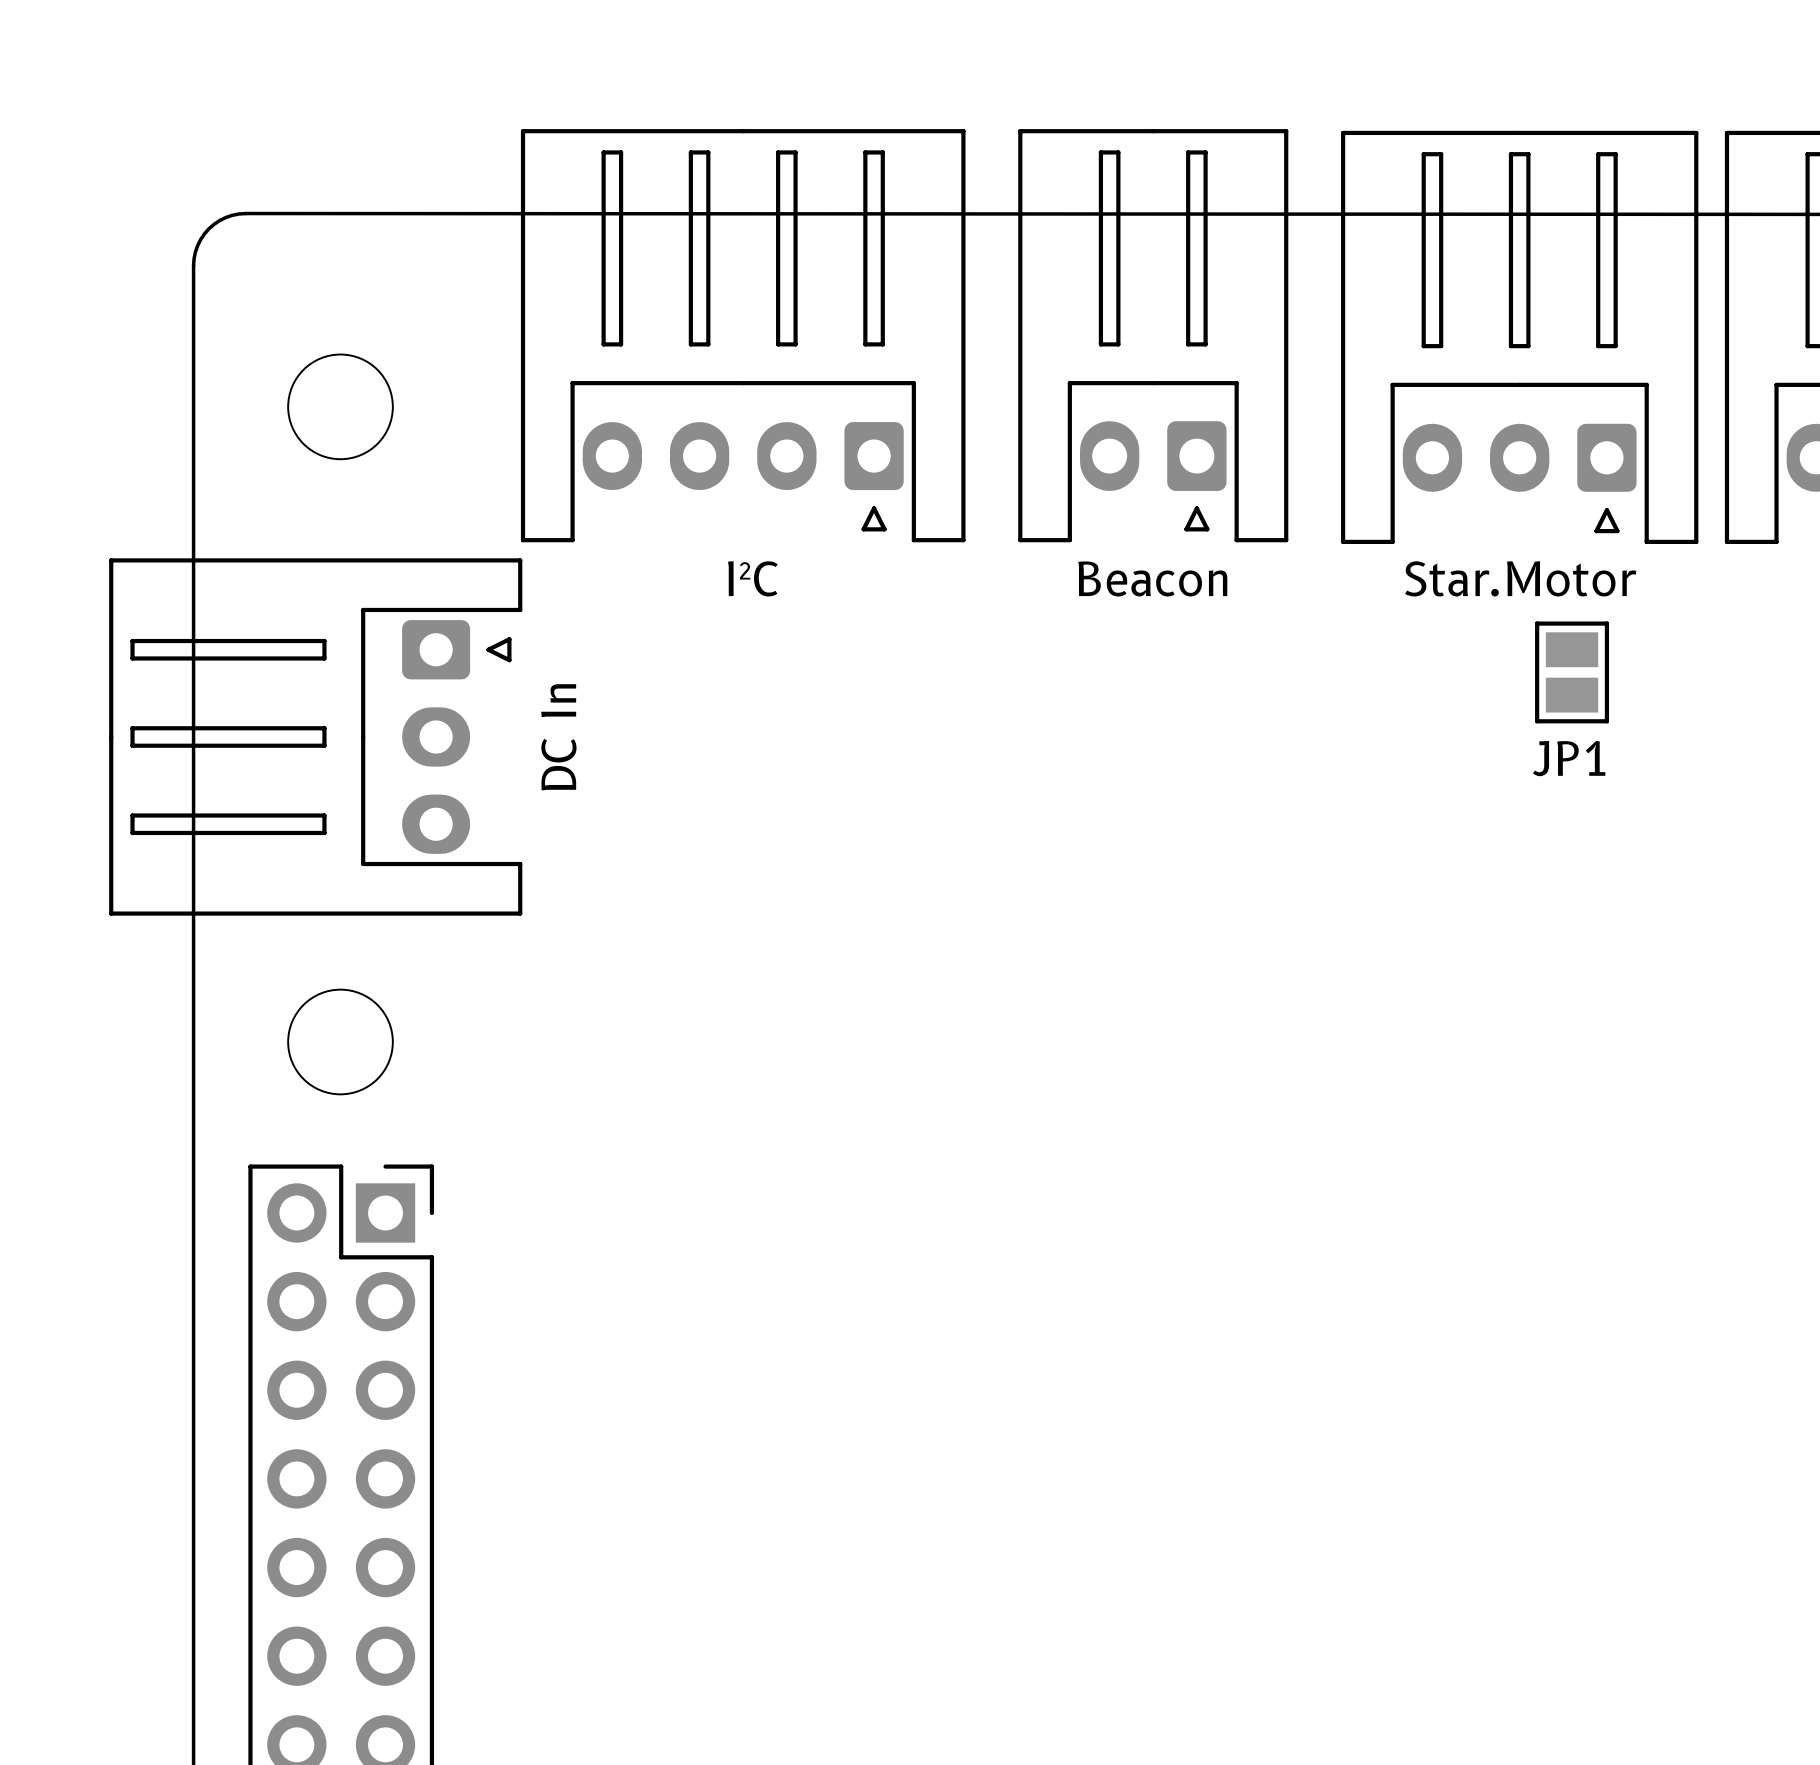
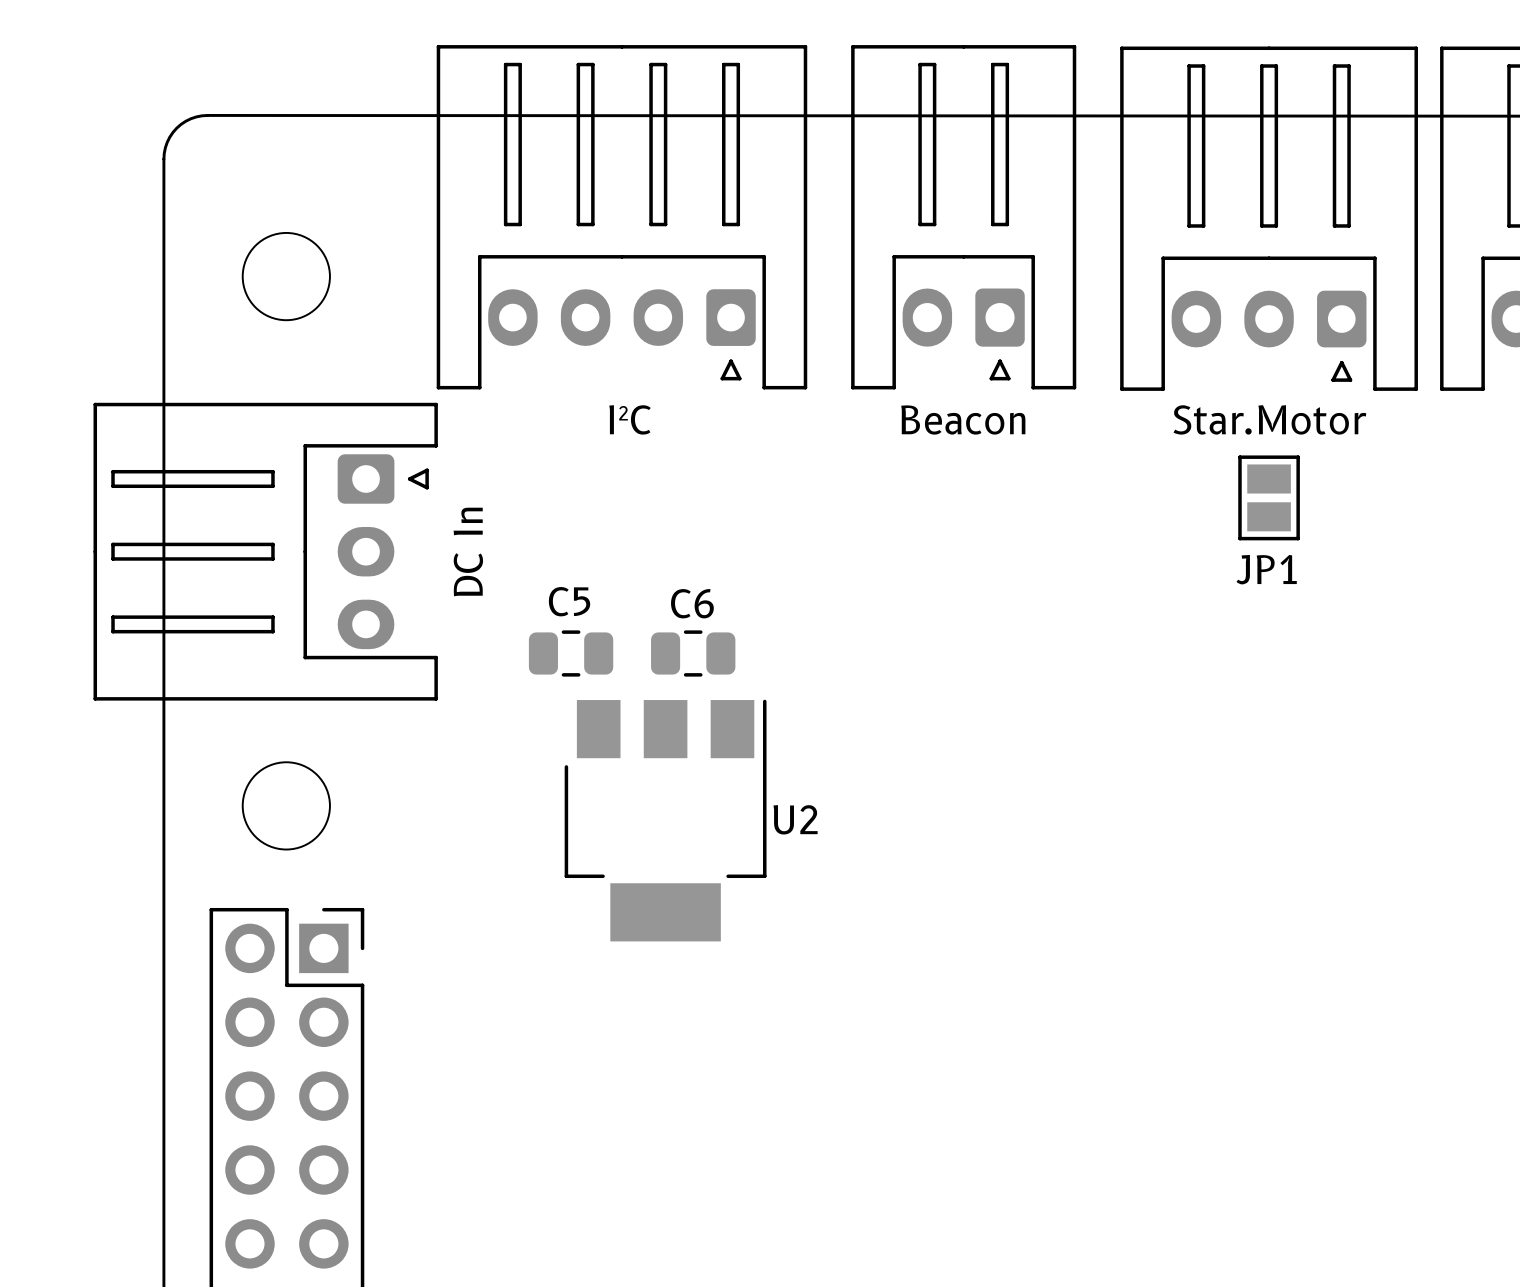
JP1 position: (1572, 672) -> (1269, 497)
C5: none -> (571, 653)
C6: none -> (693, 653)
U2: none -> (665, 820)

